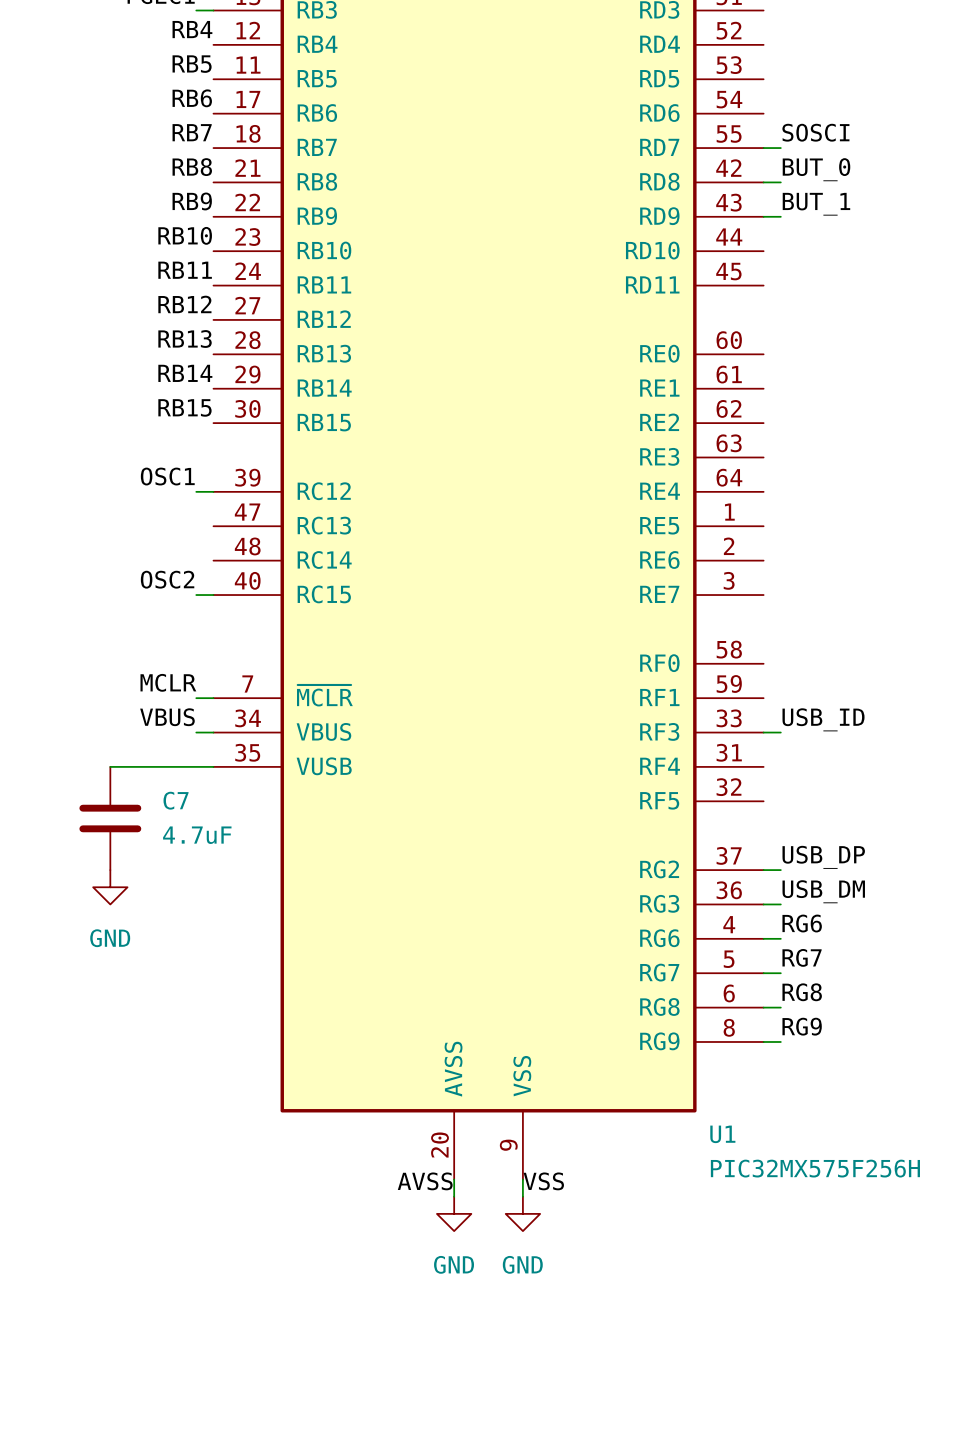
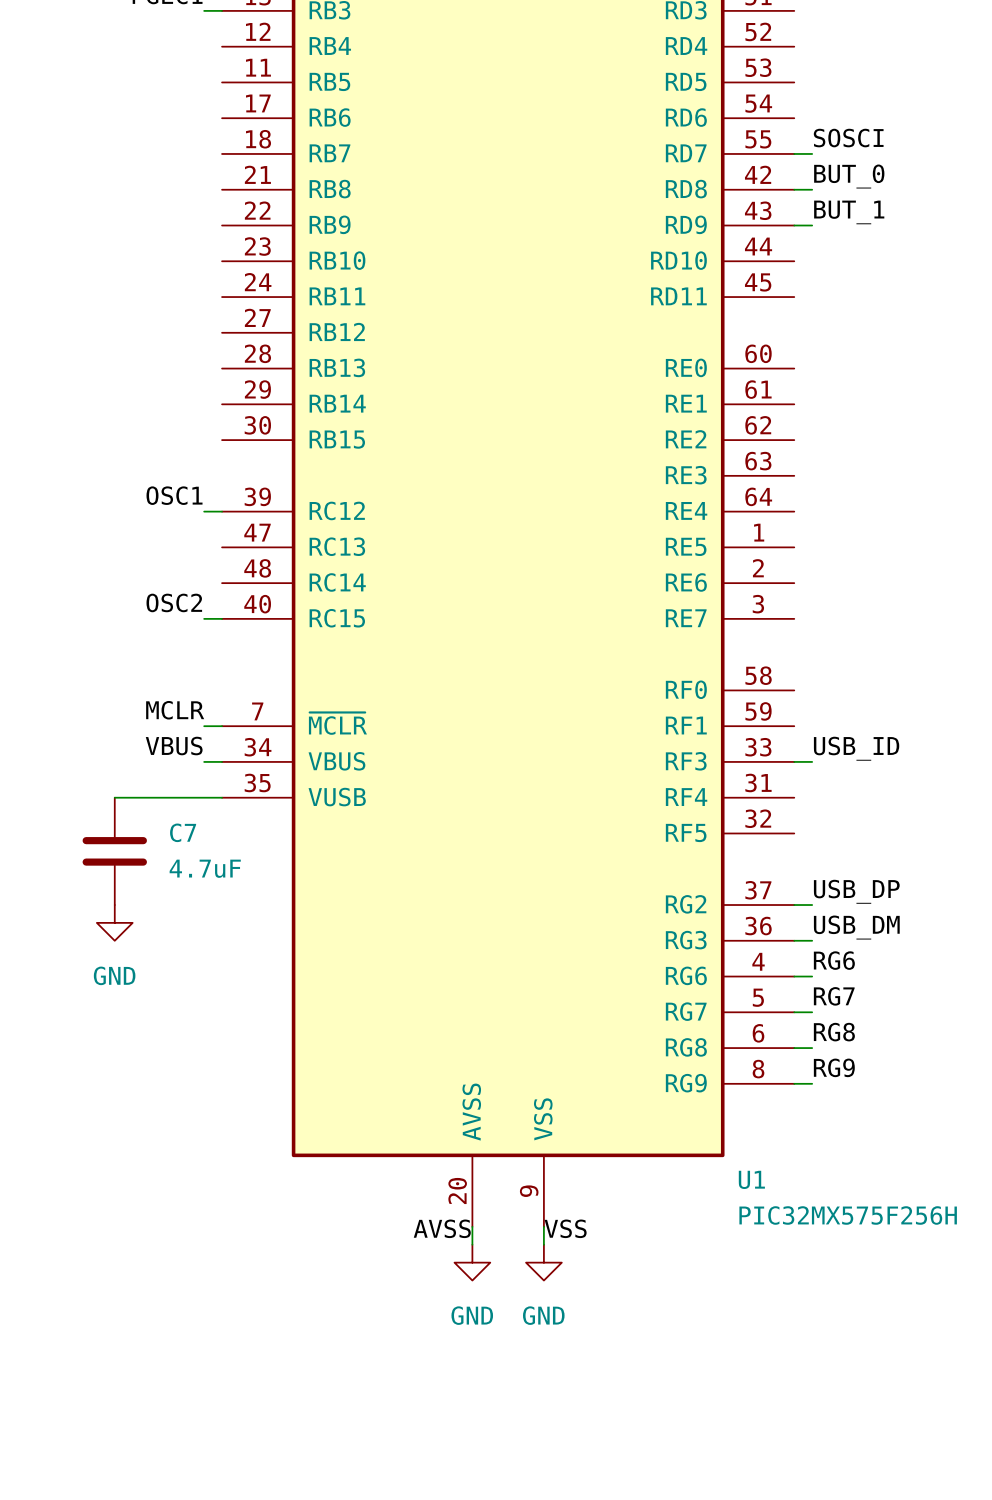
label: RB4 (192, 29) -> none
label: RB5 (192, 64) -> none
label: RB6 (192, 98) -> none
label: RB7 (192, 132) -> none
label: RB8 (192, 167) -> none
label: RB9 (192, 201) -> none
label: RB10 (185, 235) -> none
label: RB11 (185, 270) -> none
label: RB12 (184, 304) -> none
label: RB13 (185, 339) -> none
label: RB14 (185, 373) -> none
label: RB15 (184, 407) -> none

